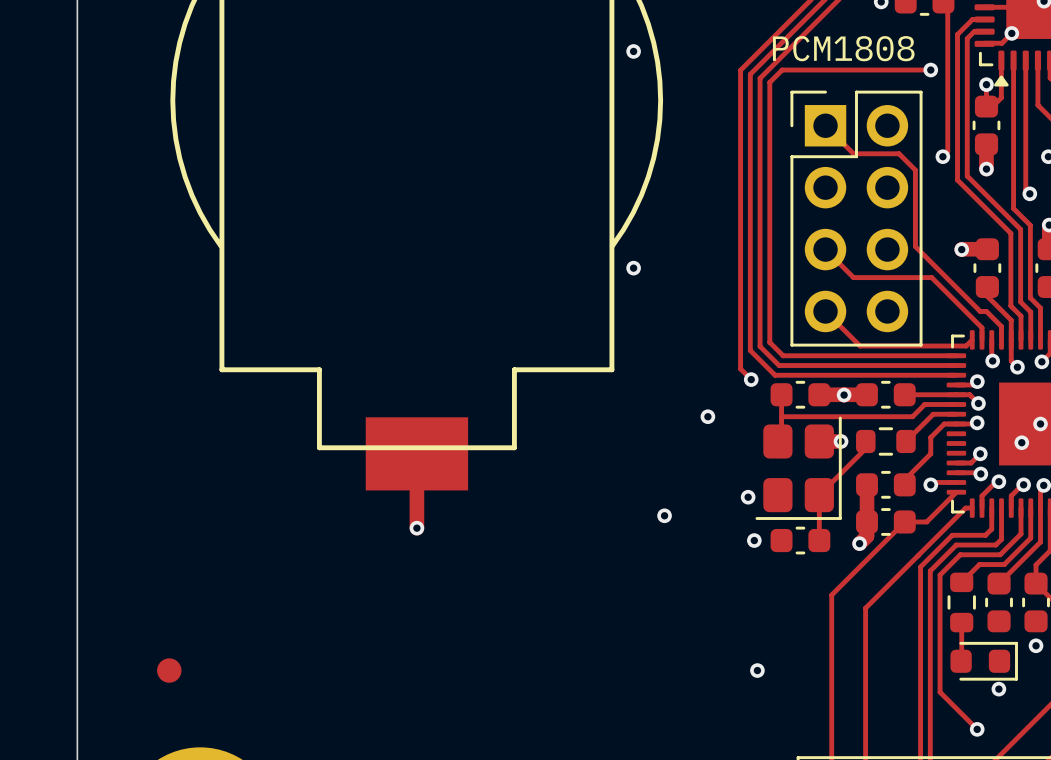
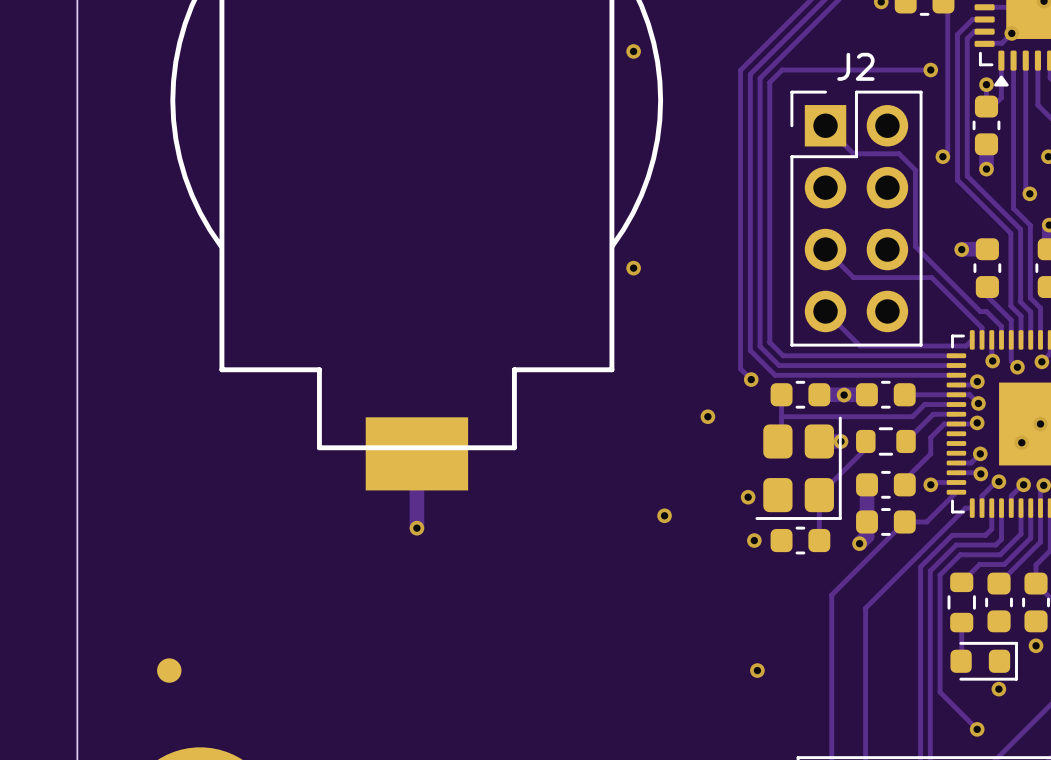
text: PCM1808 (843, 48) -> none
J2 name: none -> J2 (855, 66)

